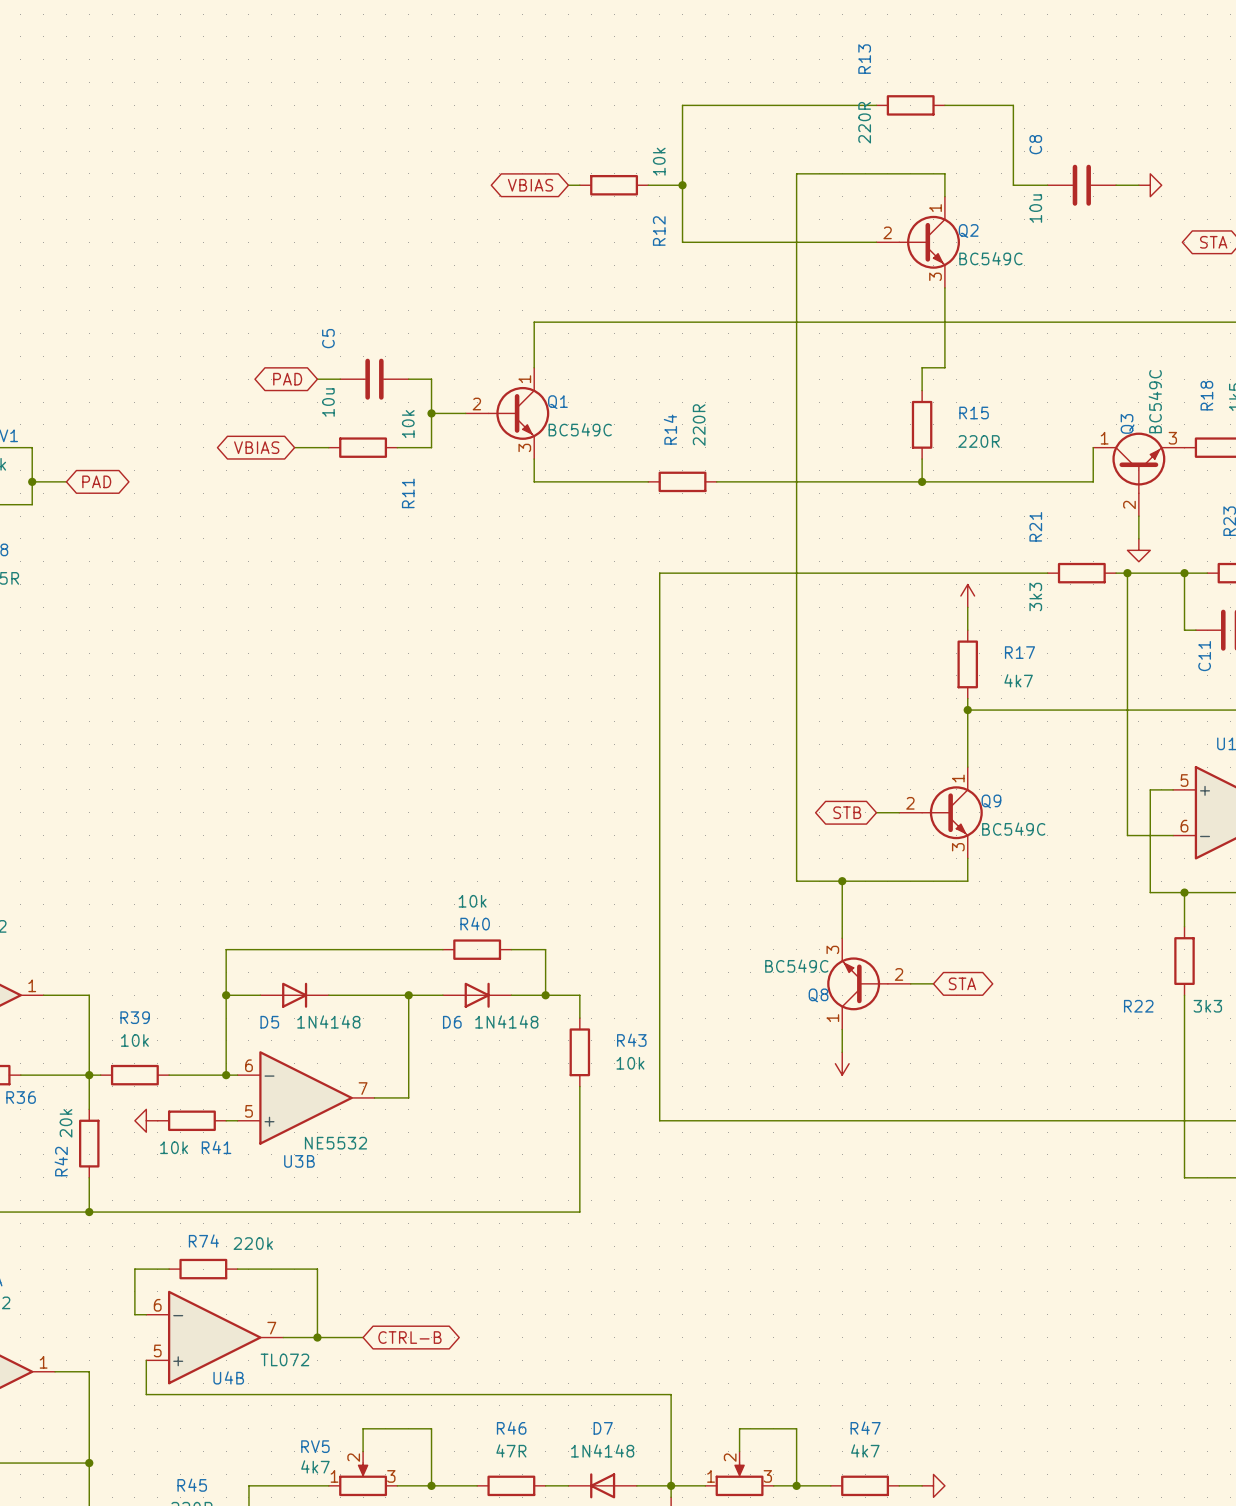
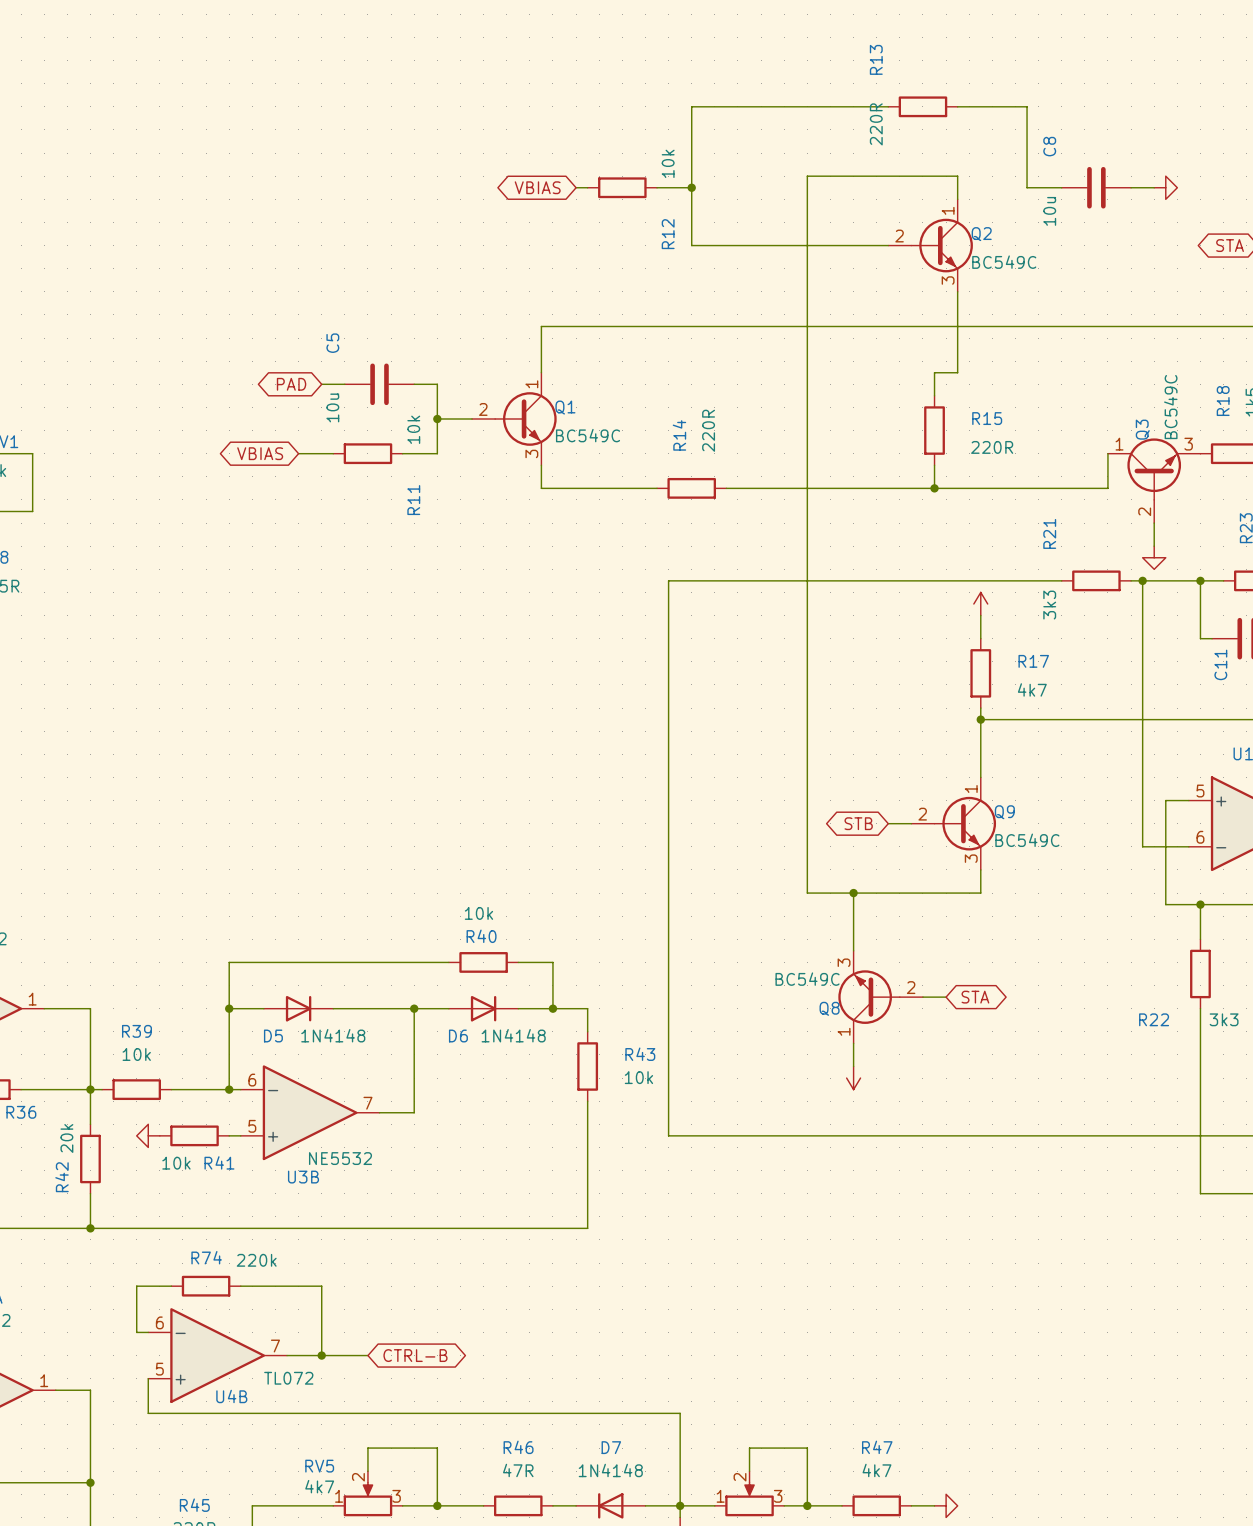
wire: (32, 481) (66, 481) -> none
junction: (32, 481) -> none
global label: PAD (96, 481) -> none

